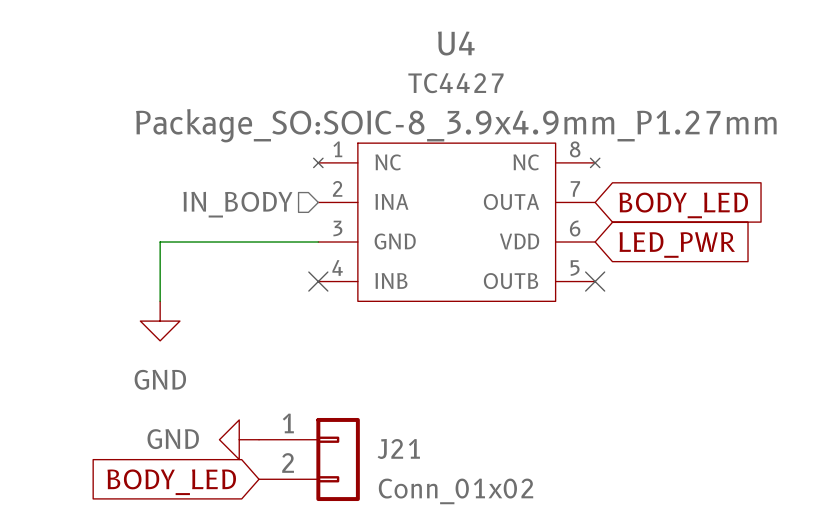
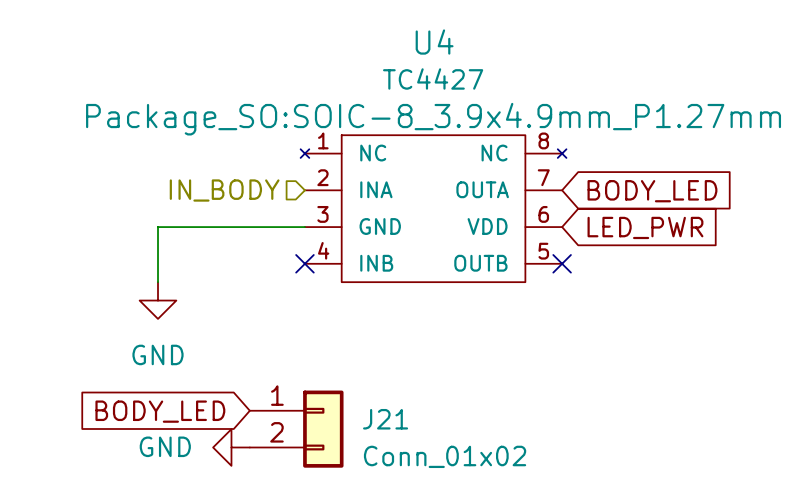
power symbol position: GND (239, 439) -> GND (231, 447)
global label position: BODY_LED (171, 482) -> BODY_LED (160, 411)

